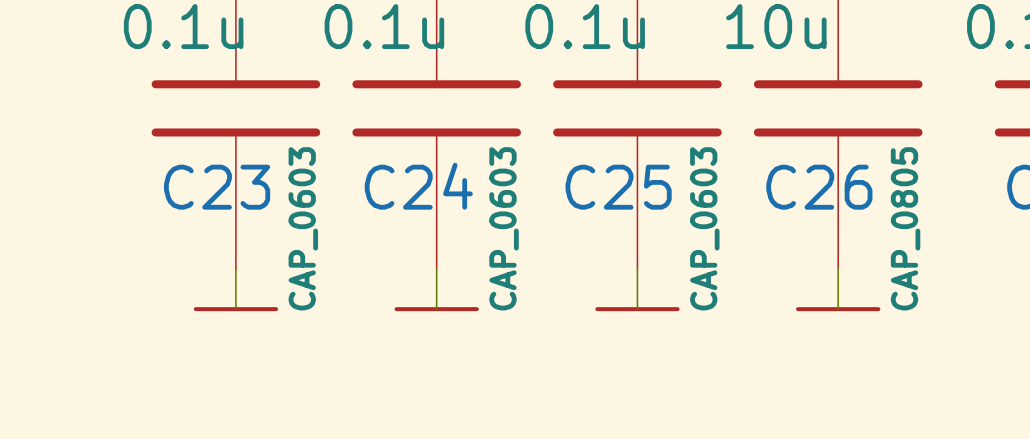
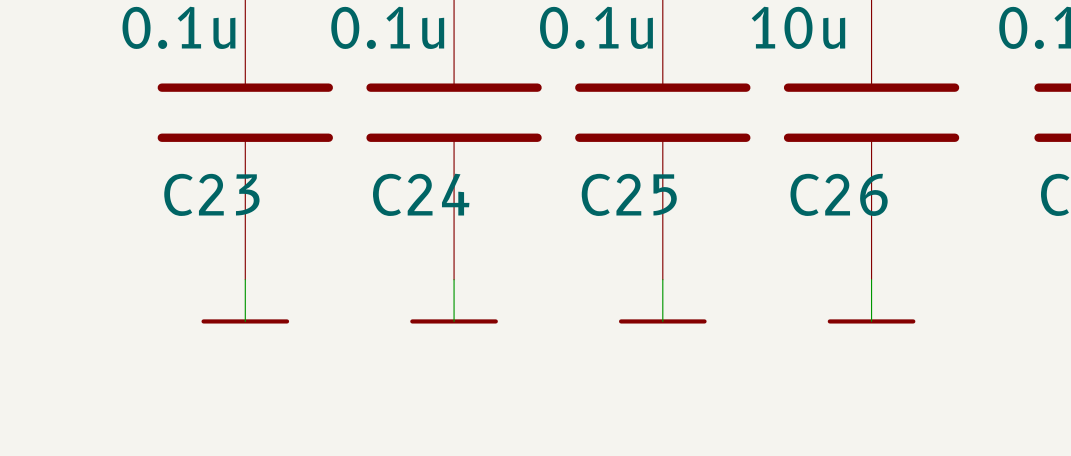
C23 text: CAP_0603 (303, 228) -> none
C24 text: CAP_0603 (504, 228) -> none
C25 text: CAP_0603 (704, 228) -> none
C26 text: CAP_0805 (905, 228) -> none

